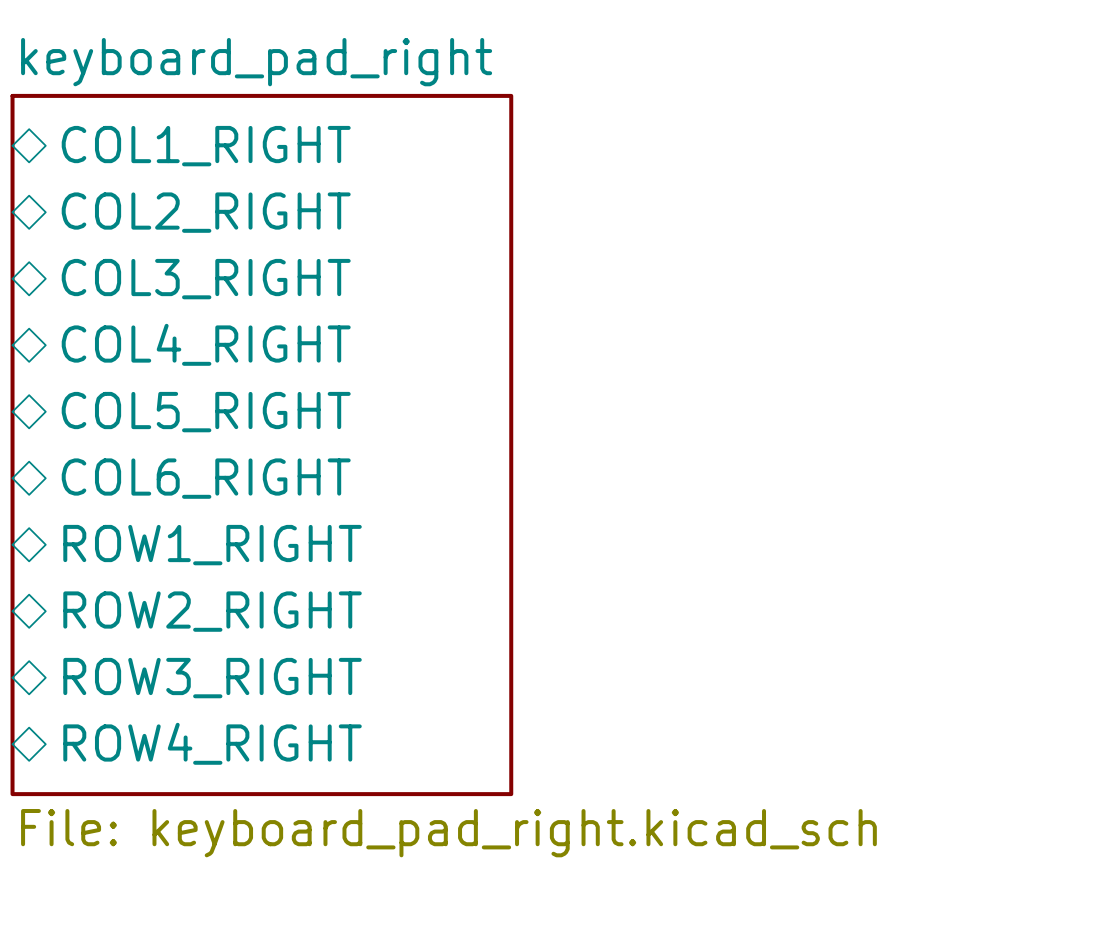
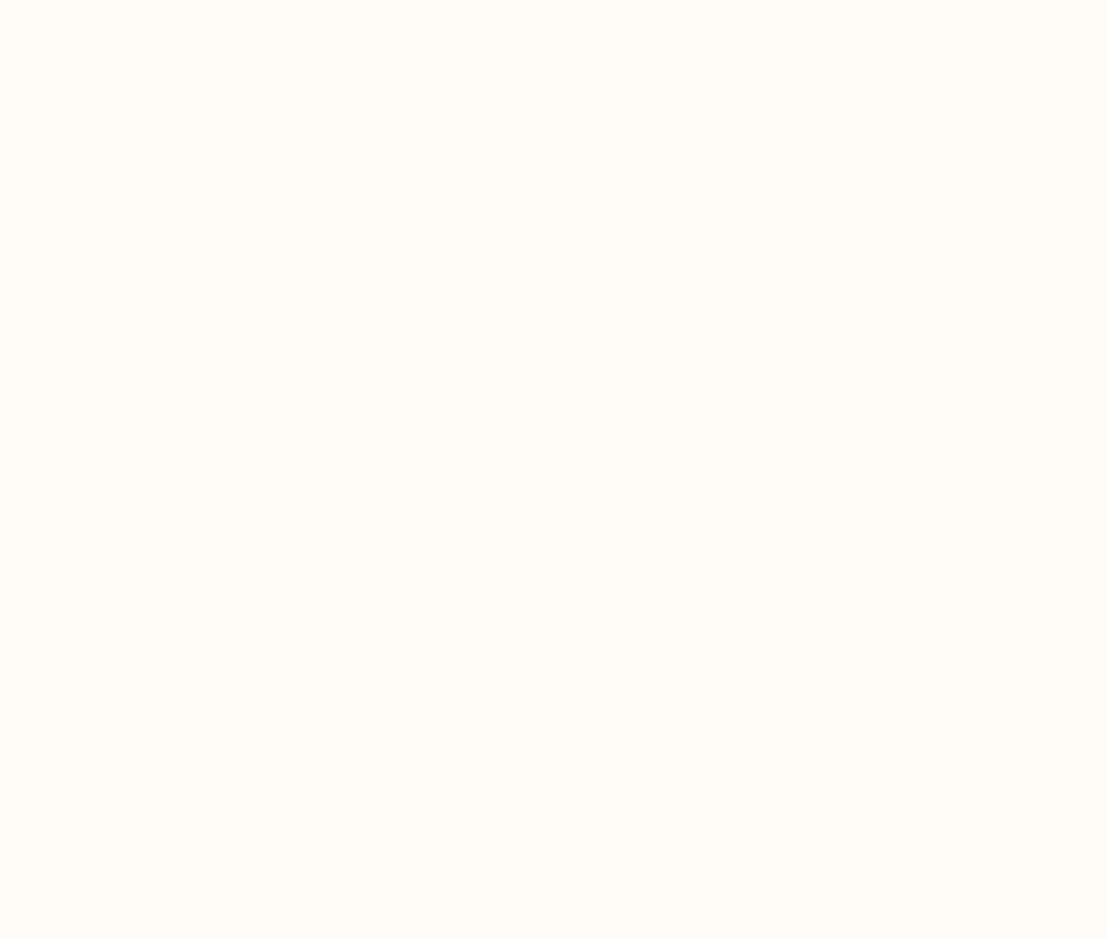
sheet pin: COL1_RIGHT (206, 146) -> none
sheet pin: COL2_RIGHT (206, 212) -> none
sheet pin: COL3_RIGHT (206, 279) -> none
sheet pin: COL4_RIGHT (206, 344) -> none
sheet pin: COL5_RIGHT (206, 412) -> none
sheet keyboard_pad_right: File: keyboard_pad_right.kicad_sch (261, 445) -> none
sheet pin: COL6_RIGHT (206, 478) -> none
sheet pin: ROW1_RIGHT (212, 545) -> none
sheet pin: ROW2_RIGHT (212, 611) -> none
sheet pin: ROW3_RIGHT (212, 678) -> none
sheet pin: ROW4_RIGHT (212, 743) -> none

